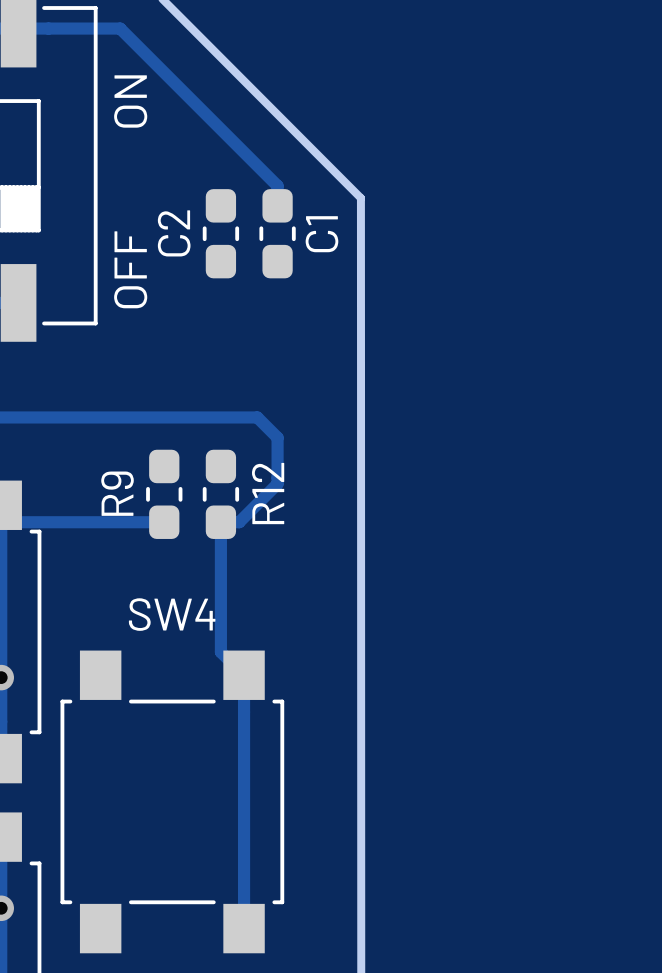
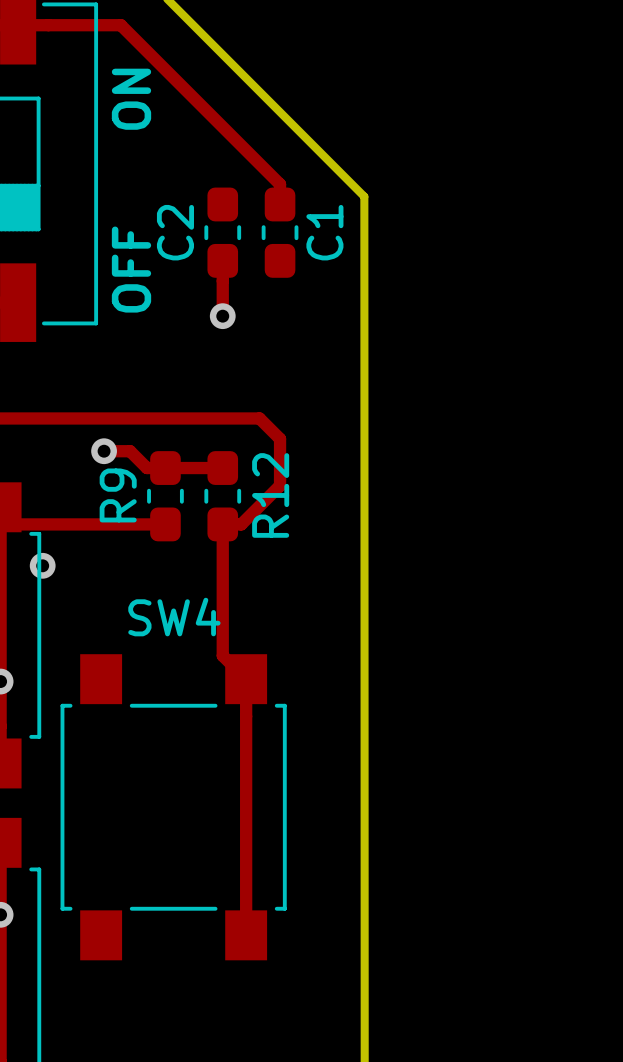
track: none -> (222, 260) (222, 316)
via: none -> (222, 316)
track: none -> (104, 451) (130, 451) (146, 468) (222, 468)
via: none -> (104, 451)
via: none -> (42, 565)

